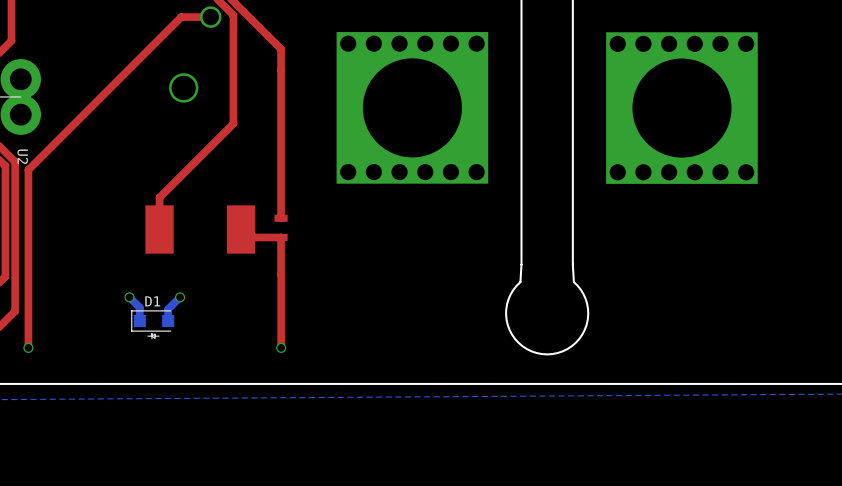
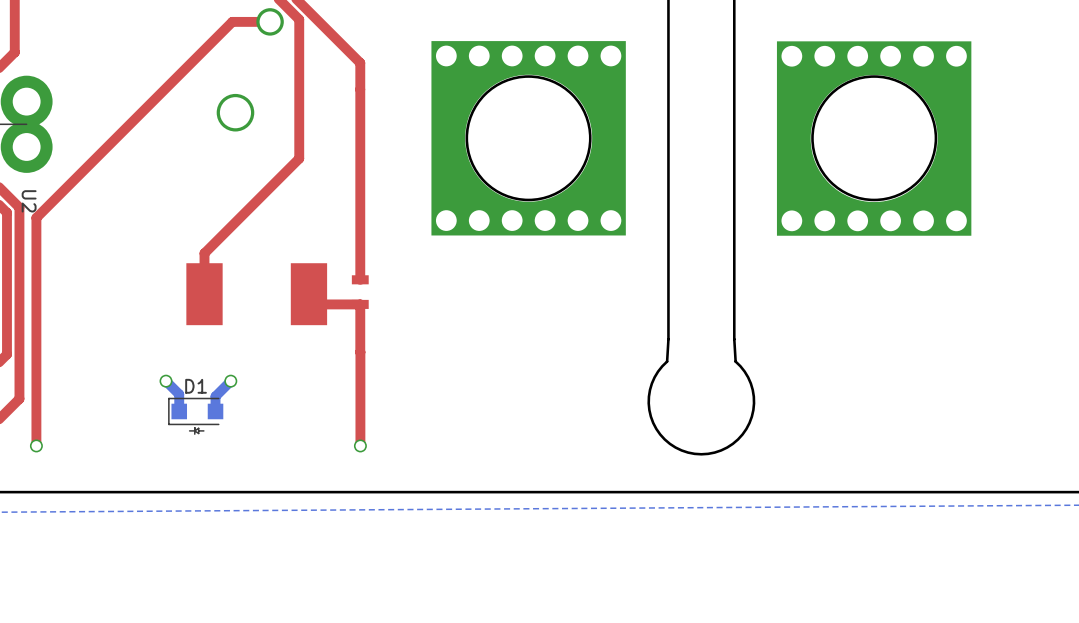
round board edge: none -> [465, 75, 592, 202]
round board edge: none -> [811, 75, 938, 202]

